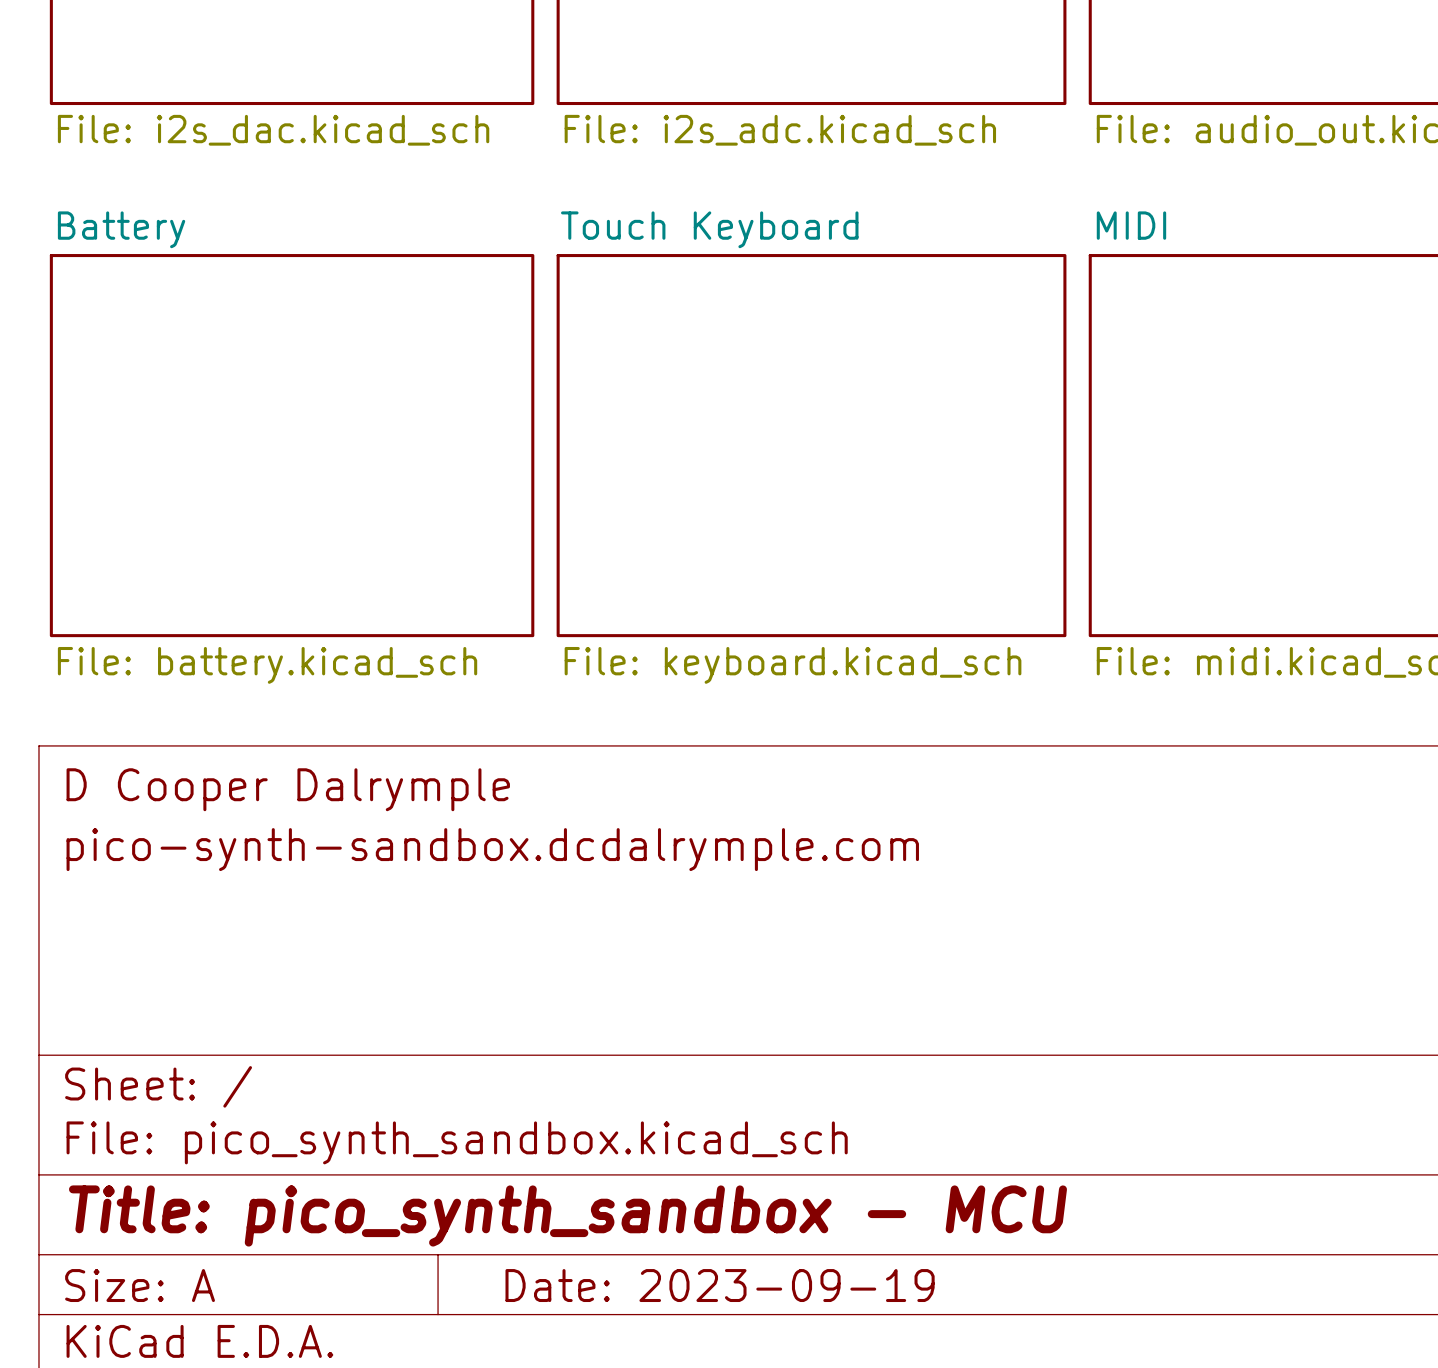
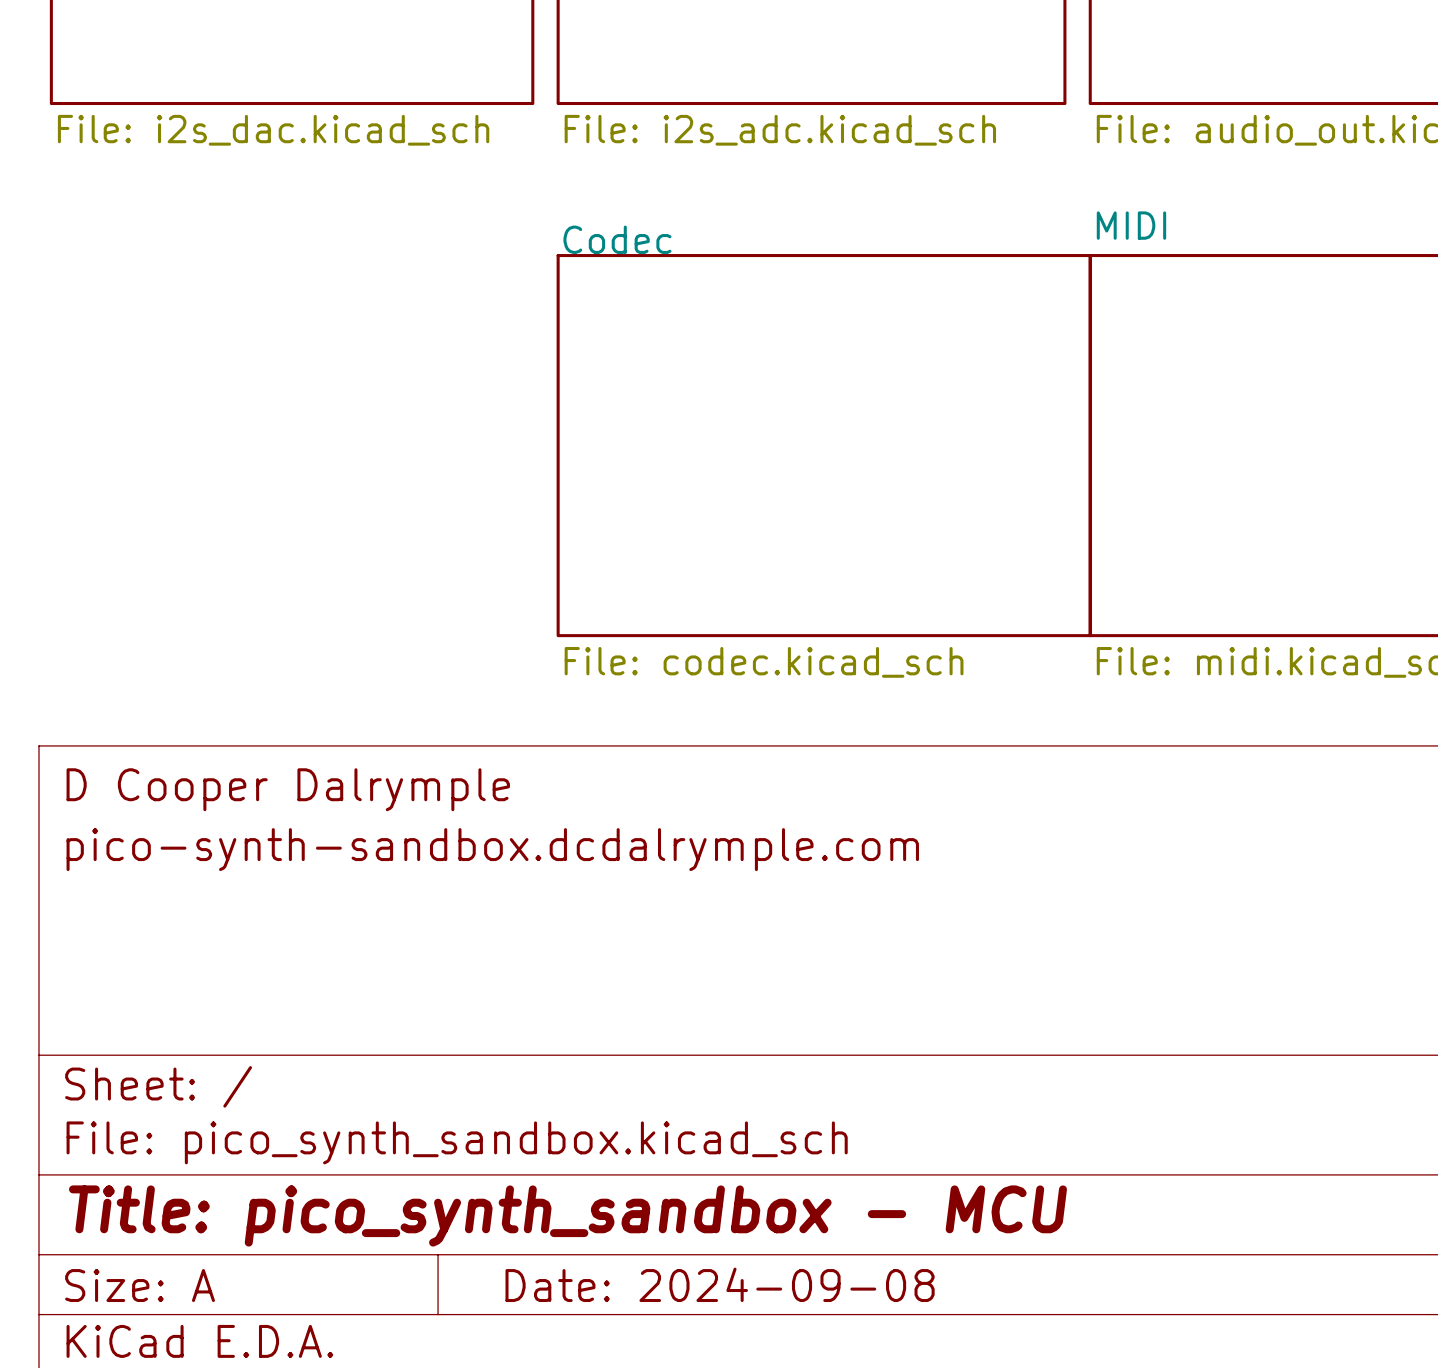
sheet Battery: File: battery.kicad_sch (292, 445) -> none
sheet Touch Keyboard: File: keyboard.kicad_sch (811, 445) -> none
sheet Codec: none -> File: codec.kicad_sch (824, 445)
title block: Date: 2023-09-19 (720, 1285) -> Date: 2024-09-08 (720, 1284)

